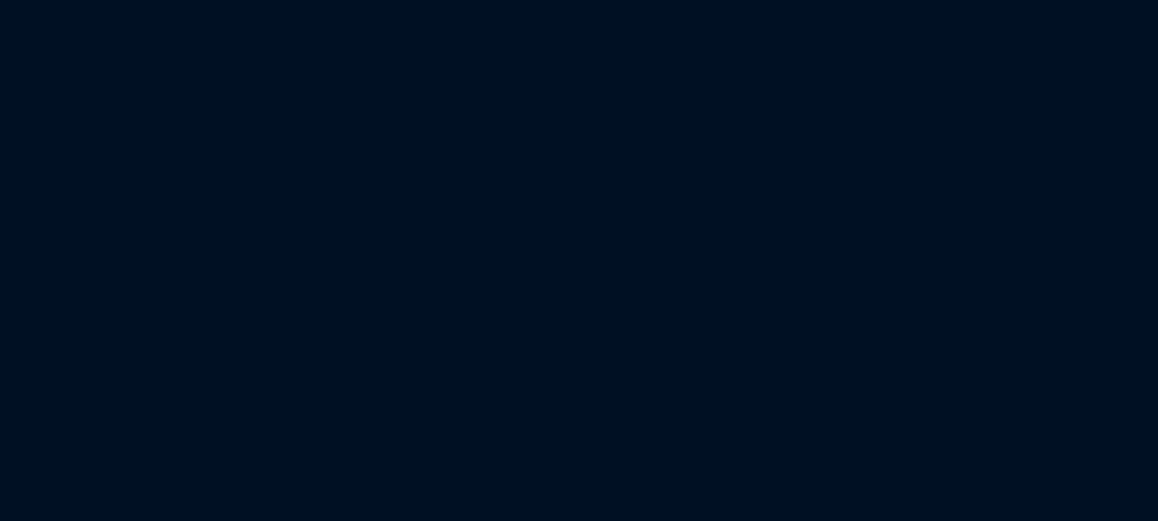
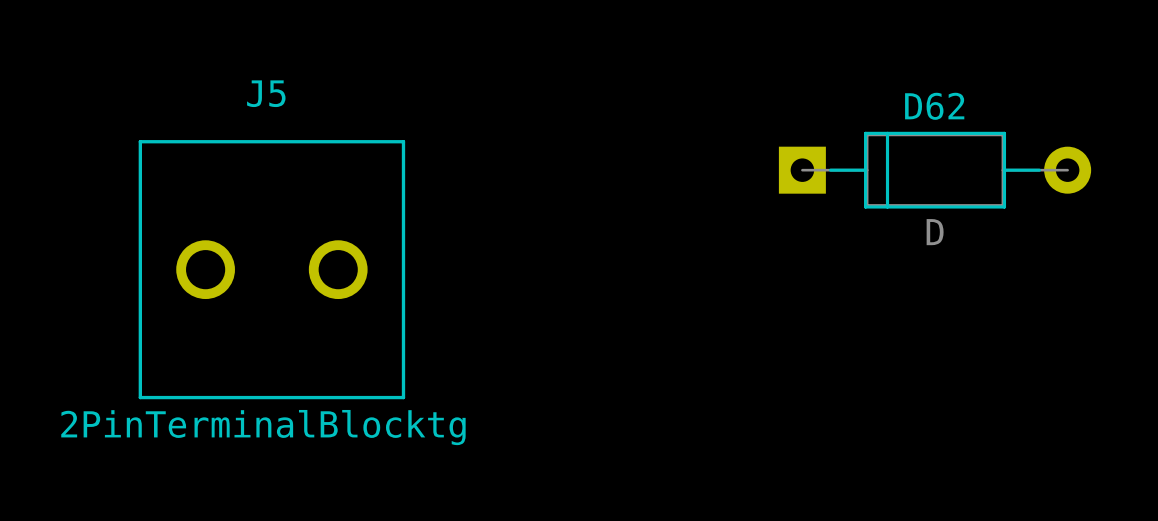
D62: none -> D (935, 170)
J5: none -> 2PinTerminalBlocktg (271, 269)

